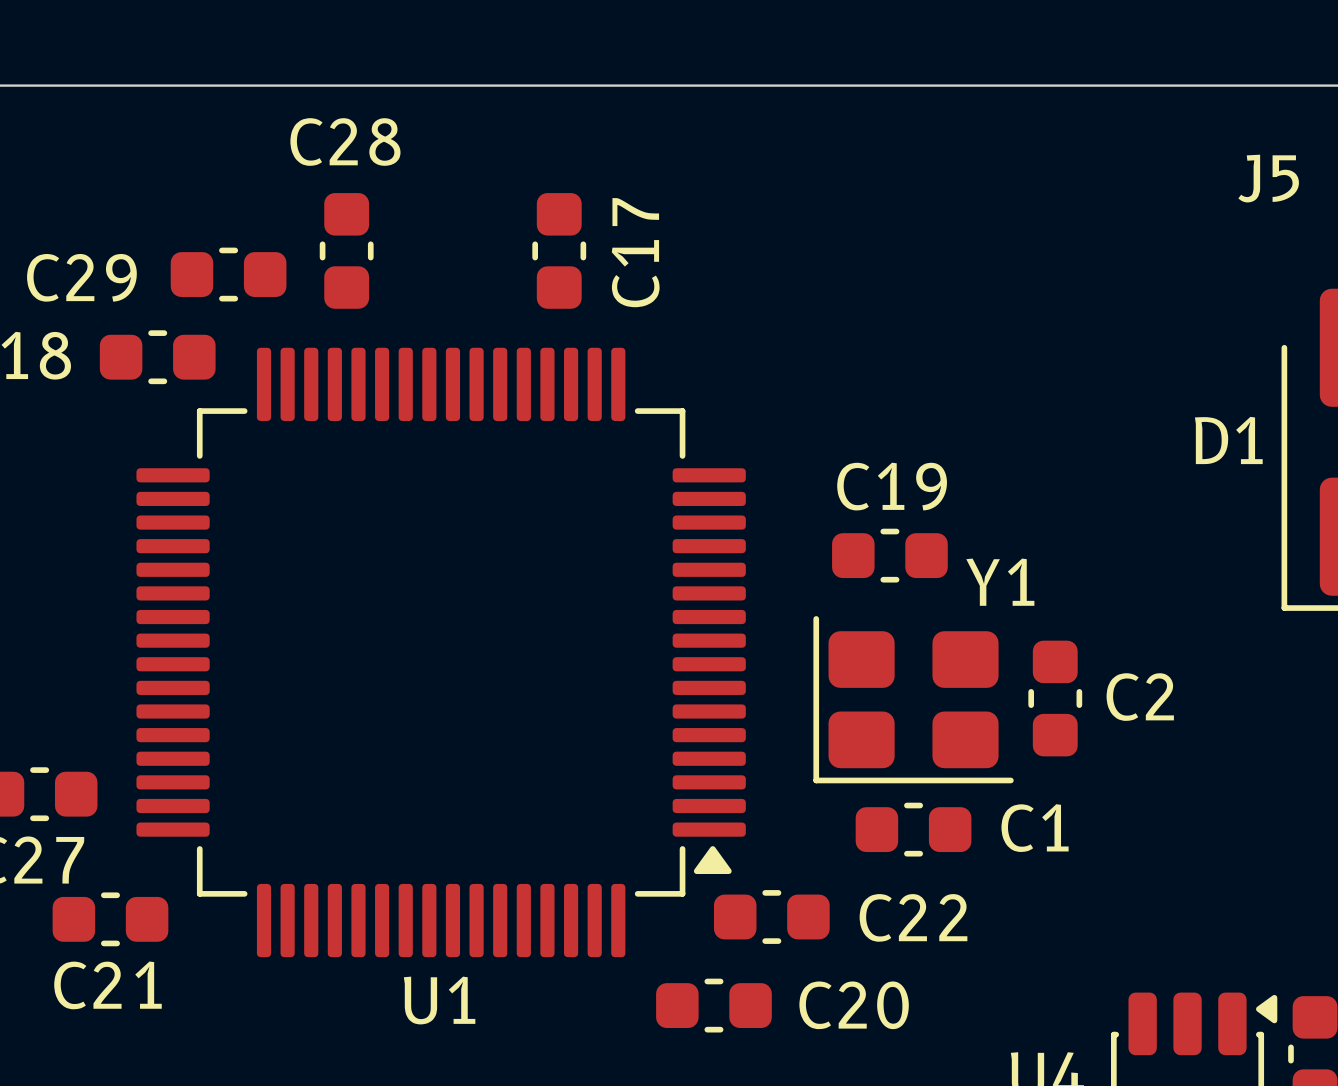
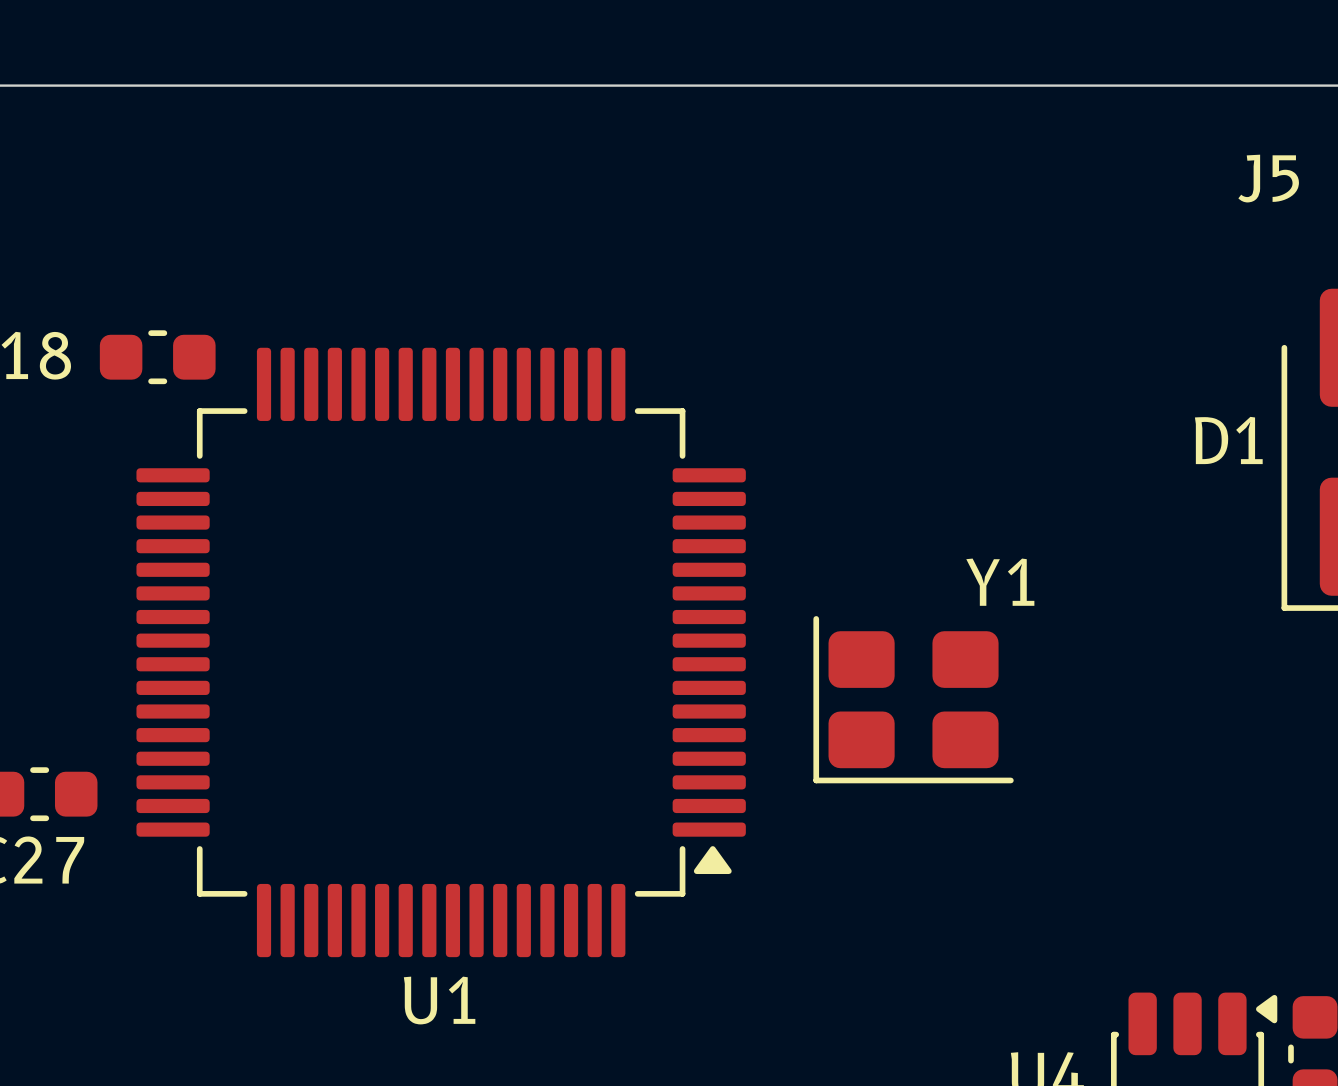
C28: (346, 250) -> none
C17: (559, 250) -> none
C29: (228, 274) -> none
C19: (889, 555) -> none
C2: (1055, 698) -> none
C1: (913, 829) -> none
C22: (771, 916) -> none
C21: (110, 919) -> none
C20: (713, 1005) -> none

